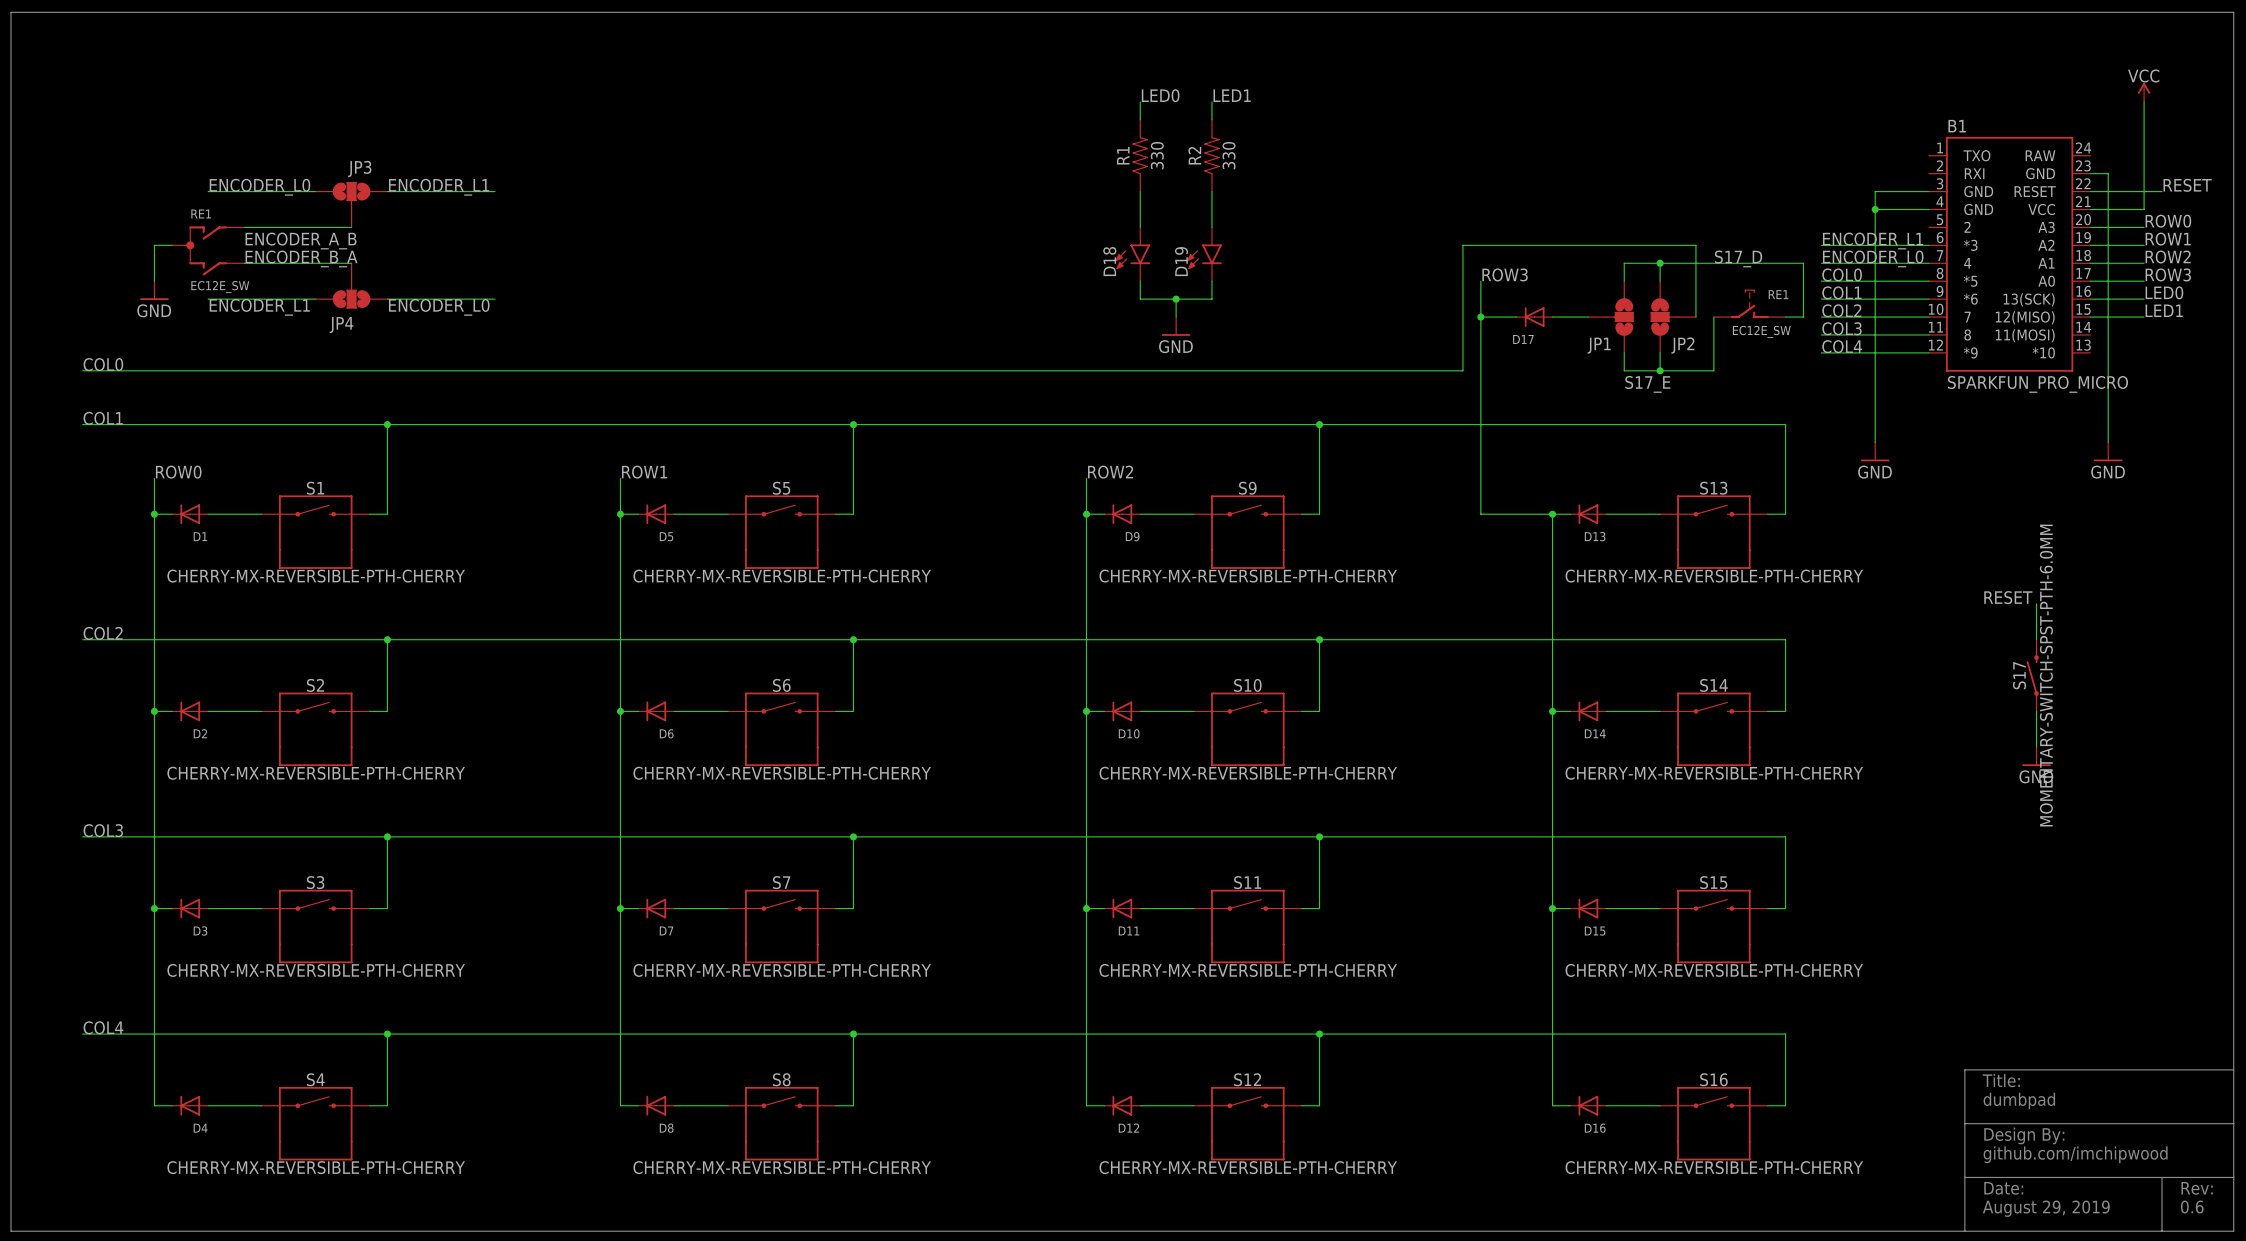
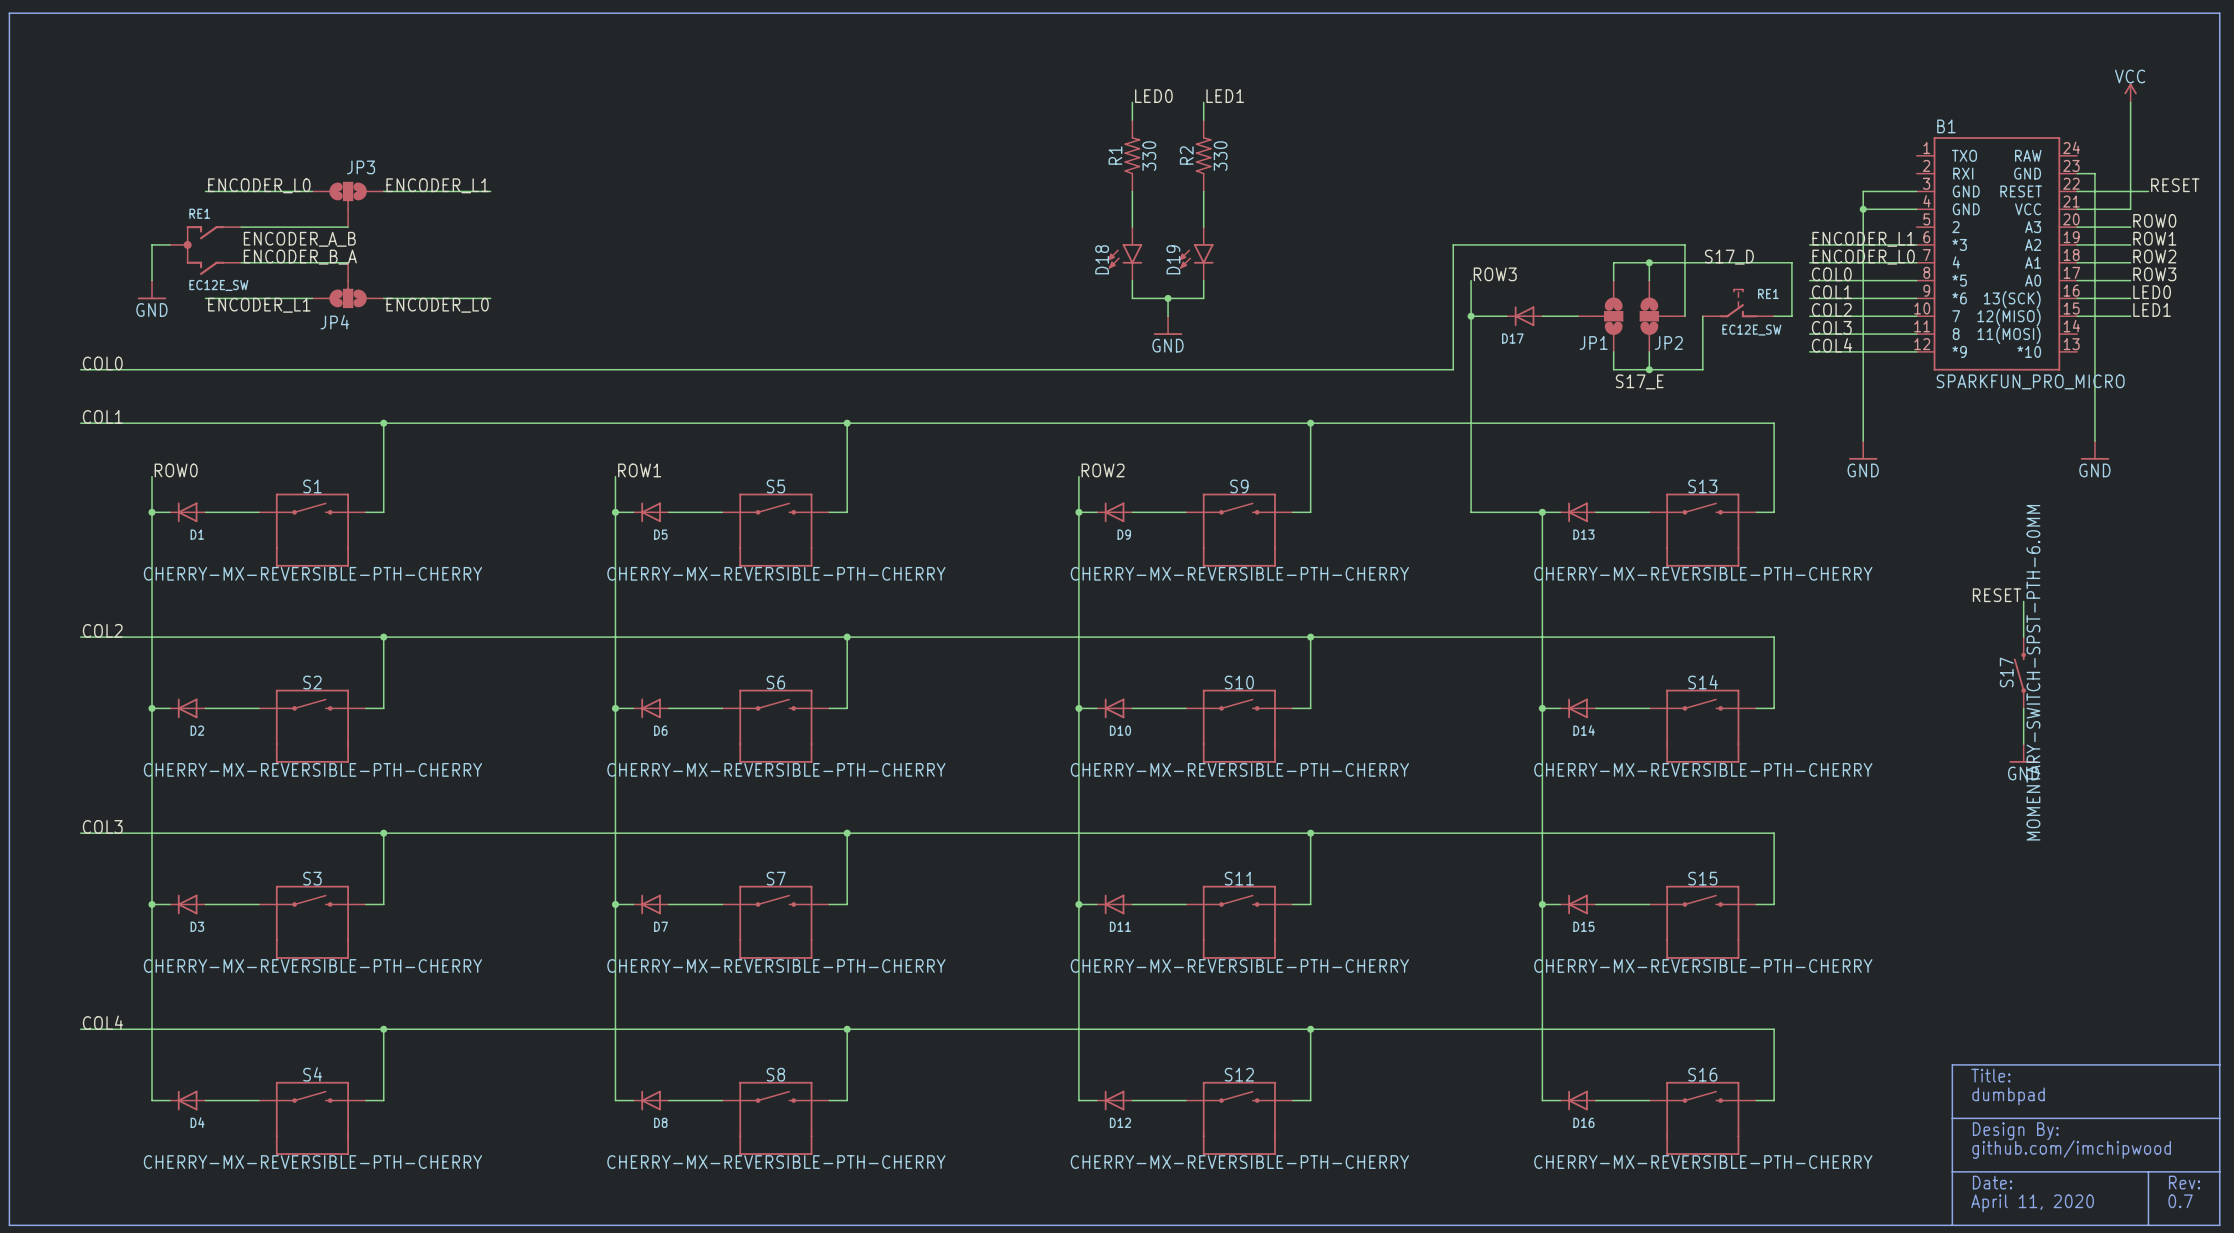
text: 0.6 (2192, 1207) -> 0.7 (2180, 1201)
text: August 29, 2019 (2046, 1208) -> April 11, 2020 (2032, 1203)

